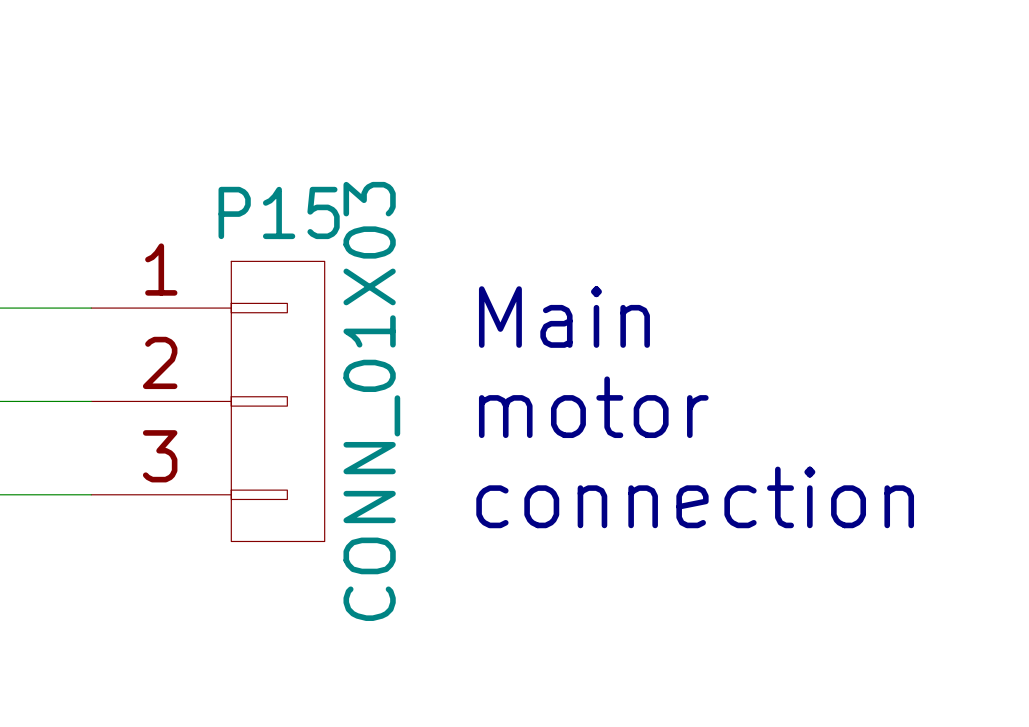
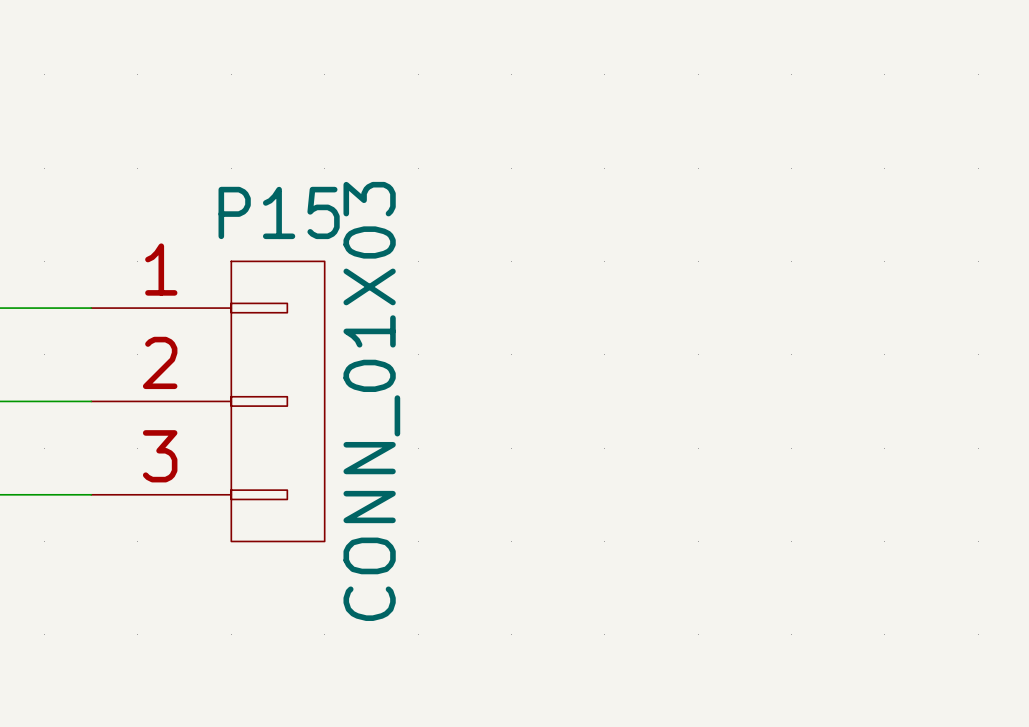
text: Main (564, 317) -> none
text: motor (593, 407) -> none
text: connection (695, 497) -> none

